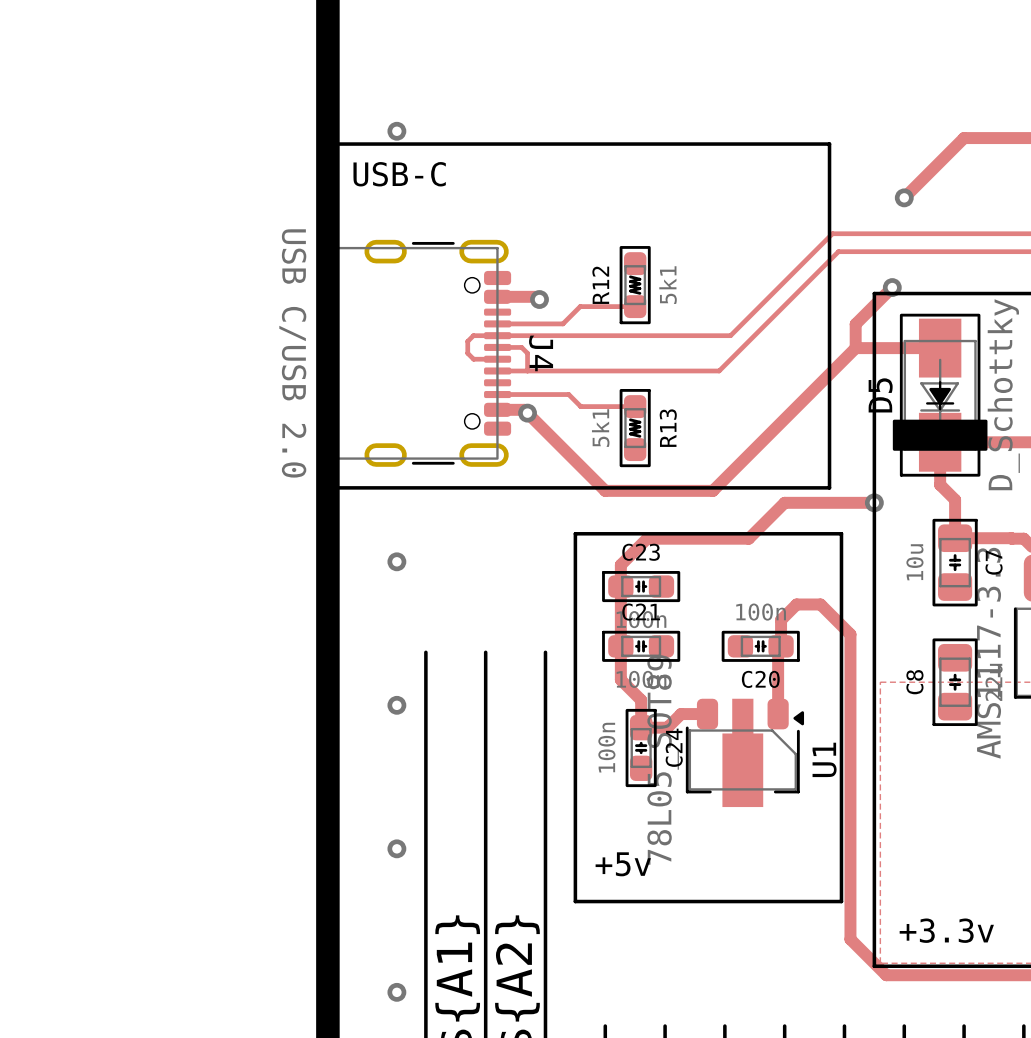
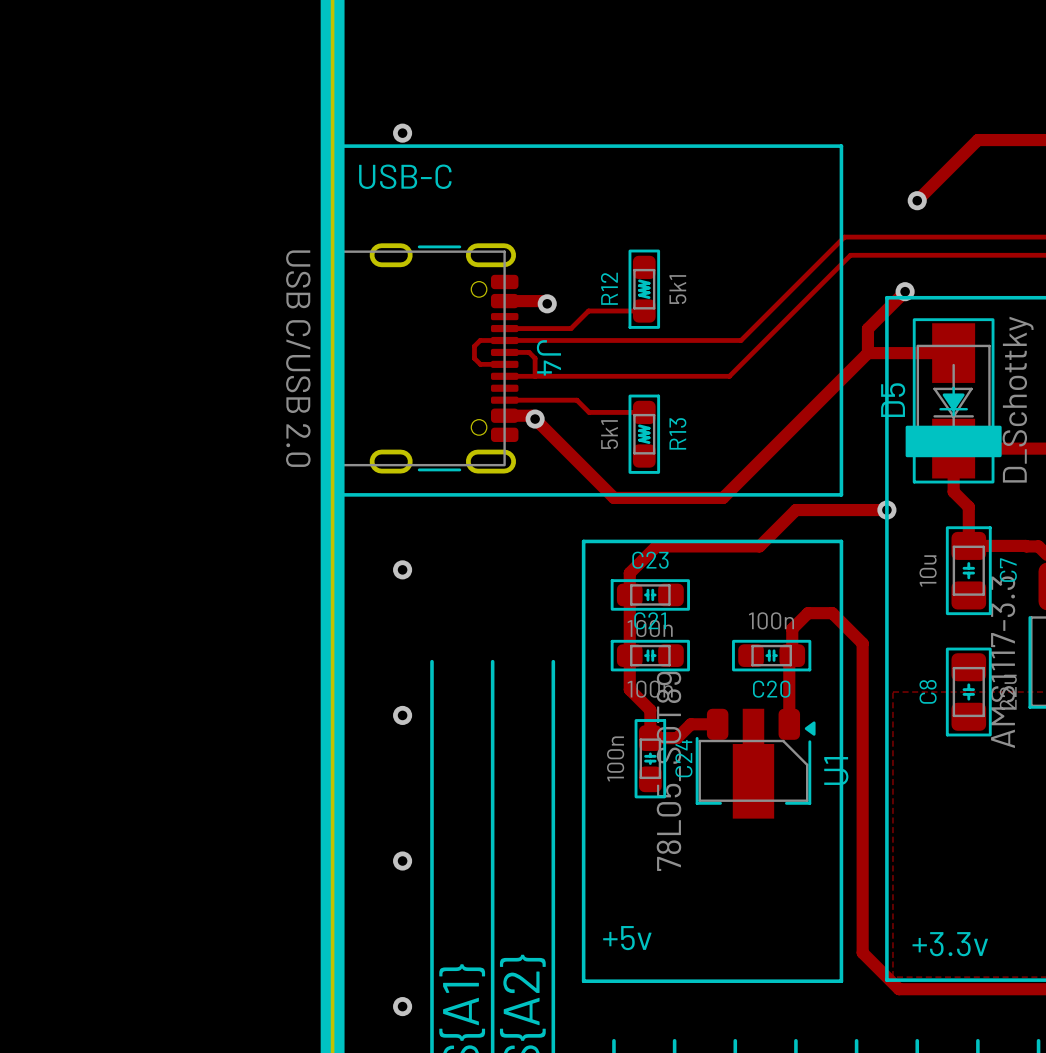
line: (829, 533) (841, 533) (841, 901) (575, 901) -> (841, 541) (841, 981) (583, 981) (583, 914)
text position: +5v (623, 864) -> +5v (627, 938)

